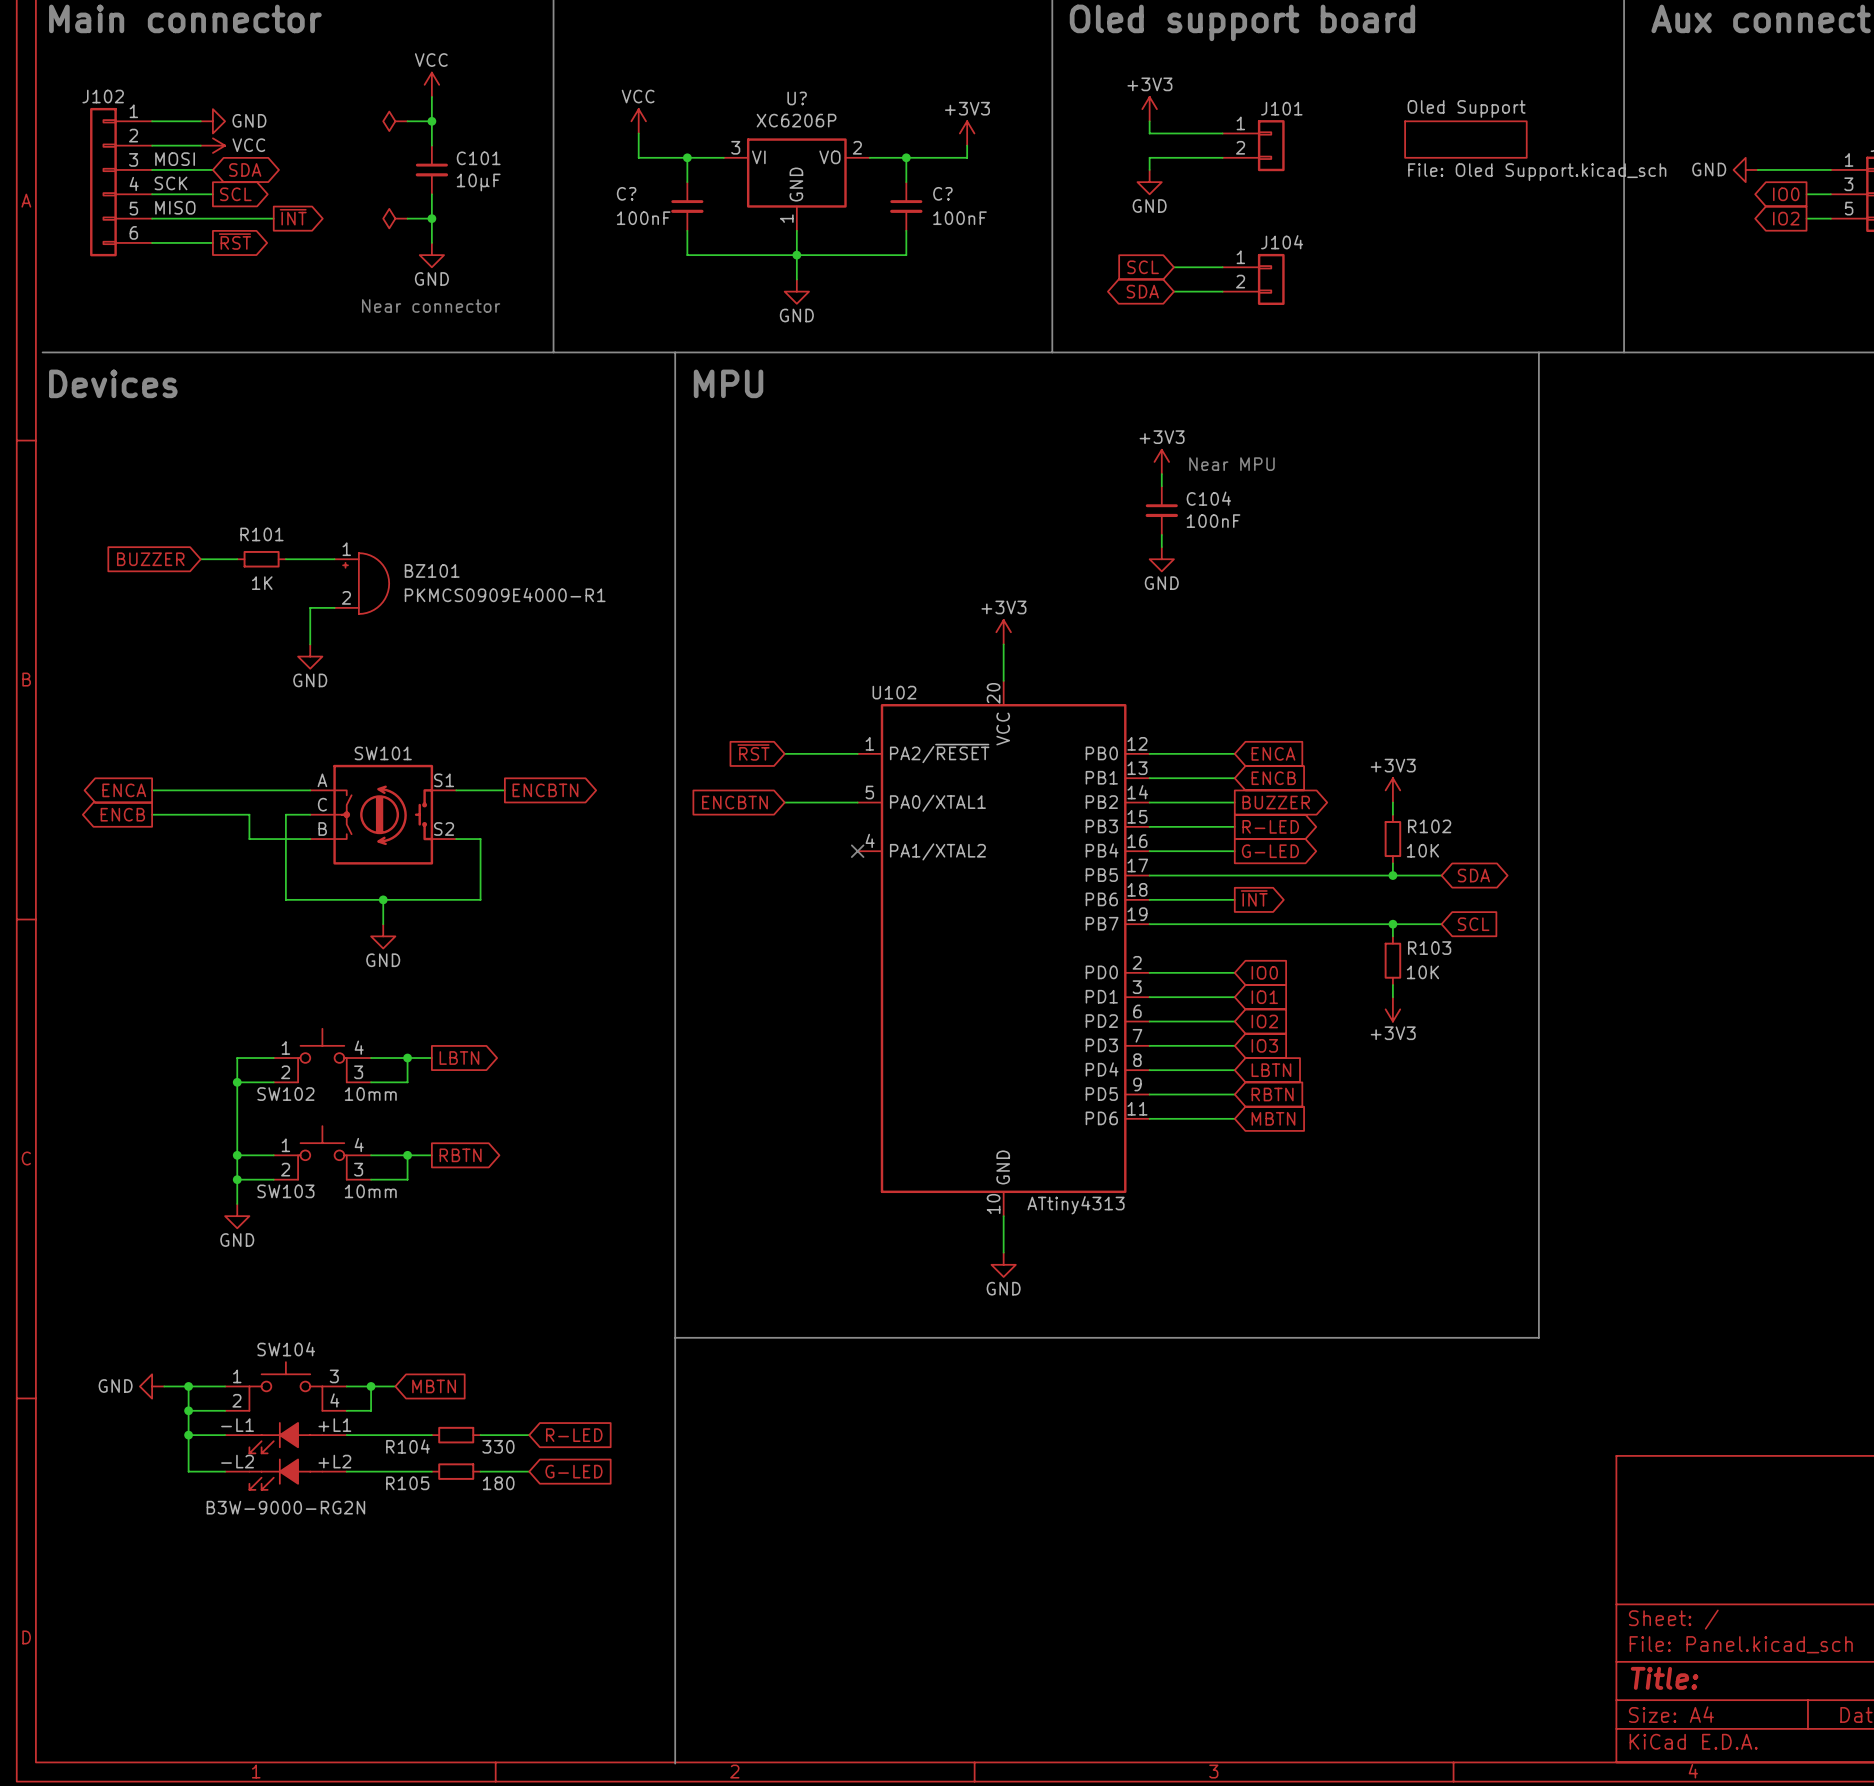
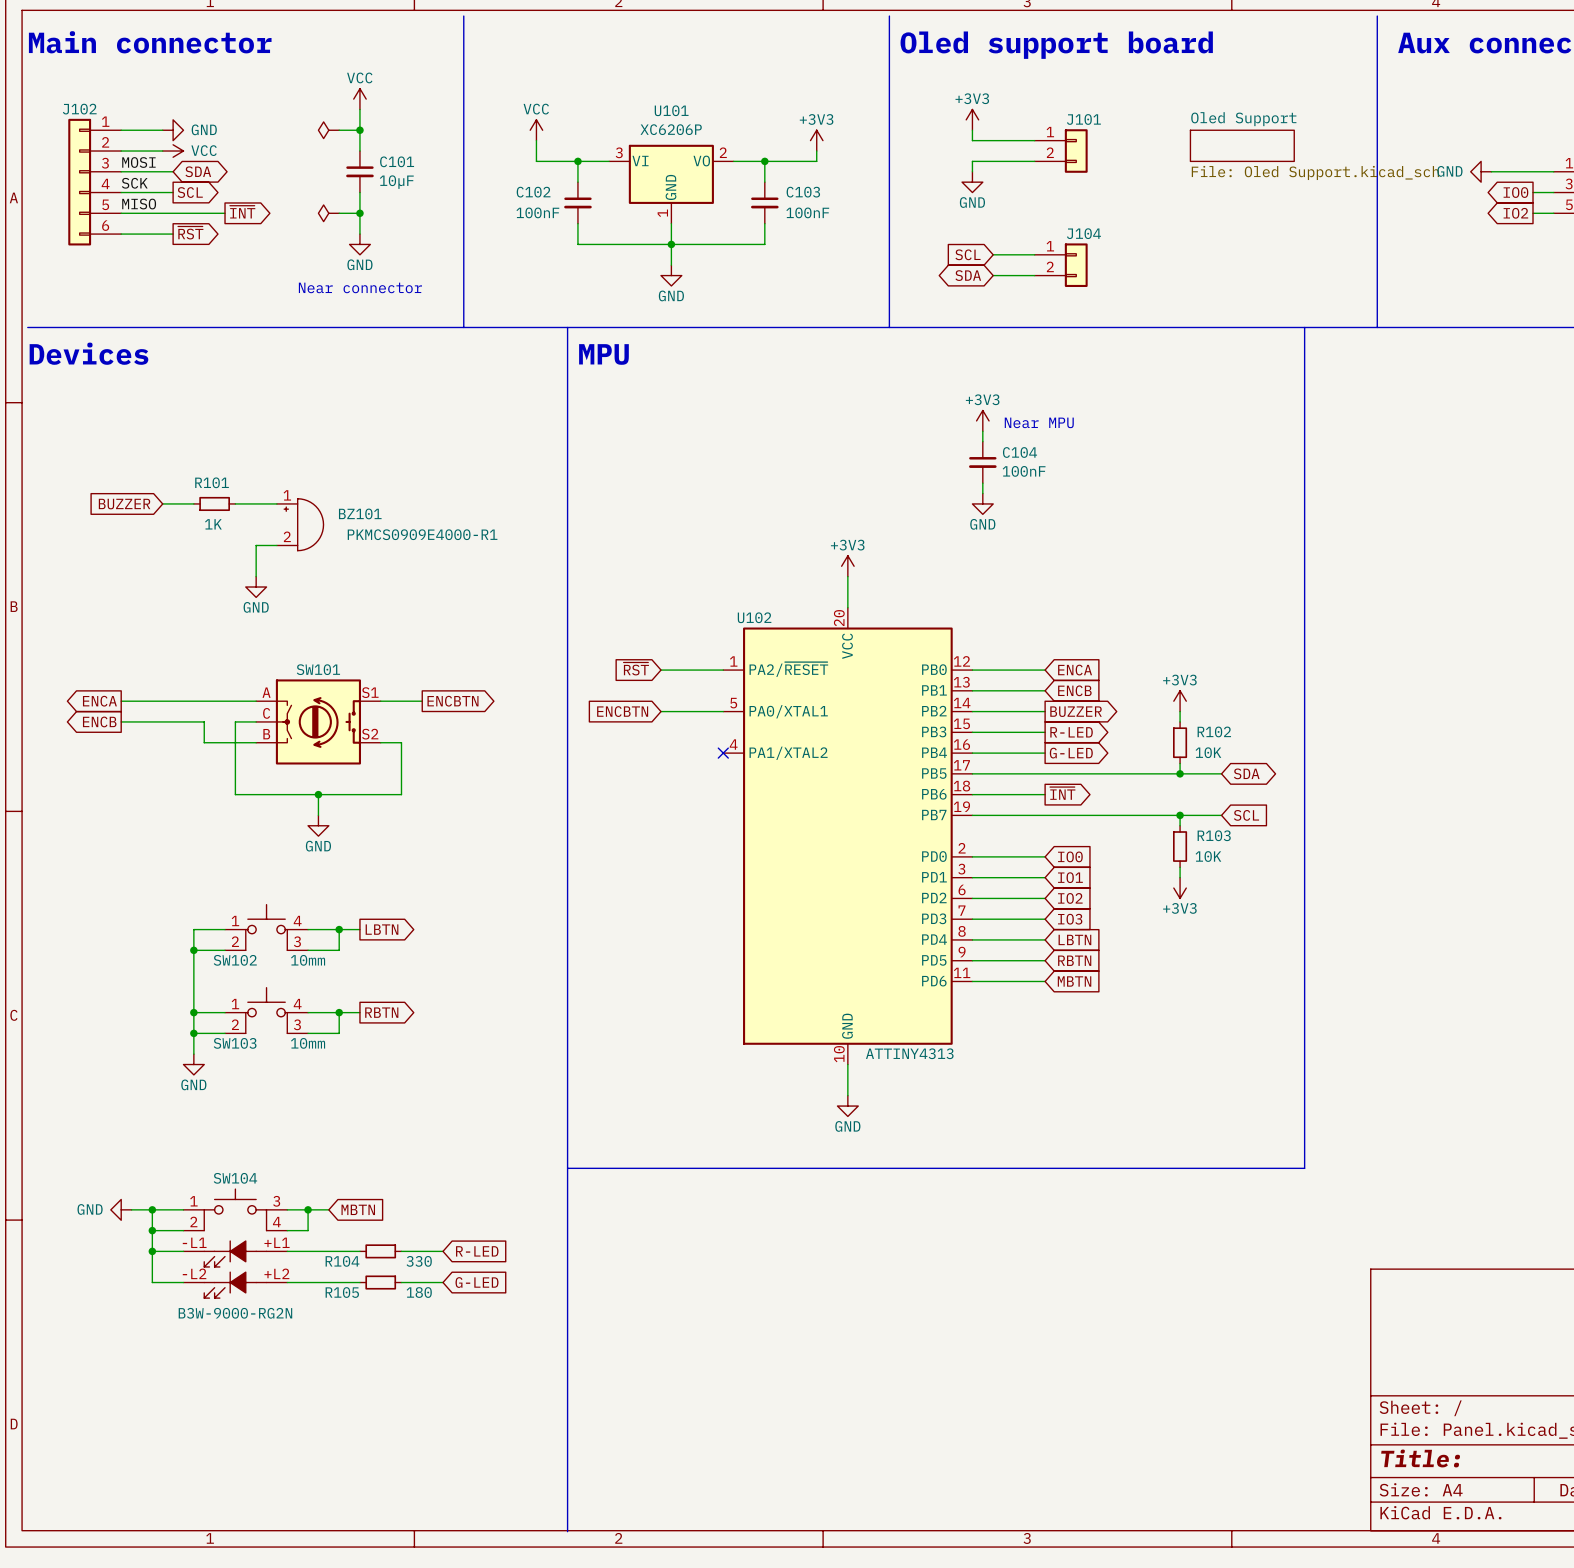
U? name: U? (797, 98) -> U101 (671, 110)
C? name: C? (626, 193) -> C102 (533, 192)
C? name: C? (942, 193) -> C103 (803, 192)
U102 value: ATtiny4313 (1076, 1205) -> ATTINY4313 (909, 1053)

